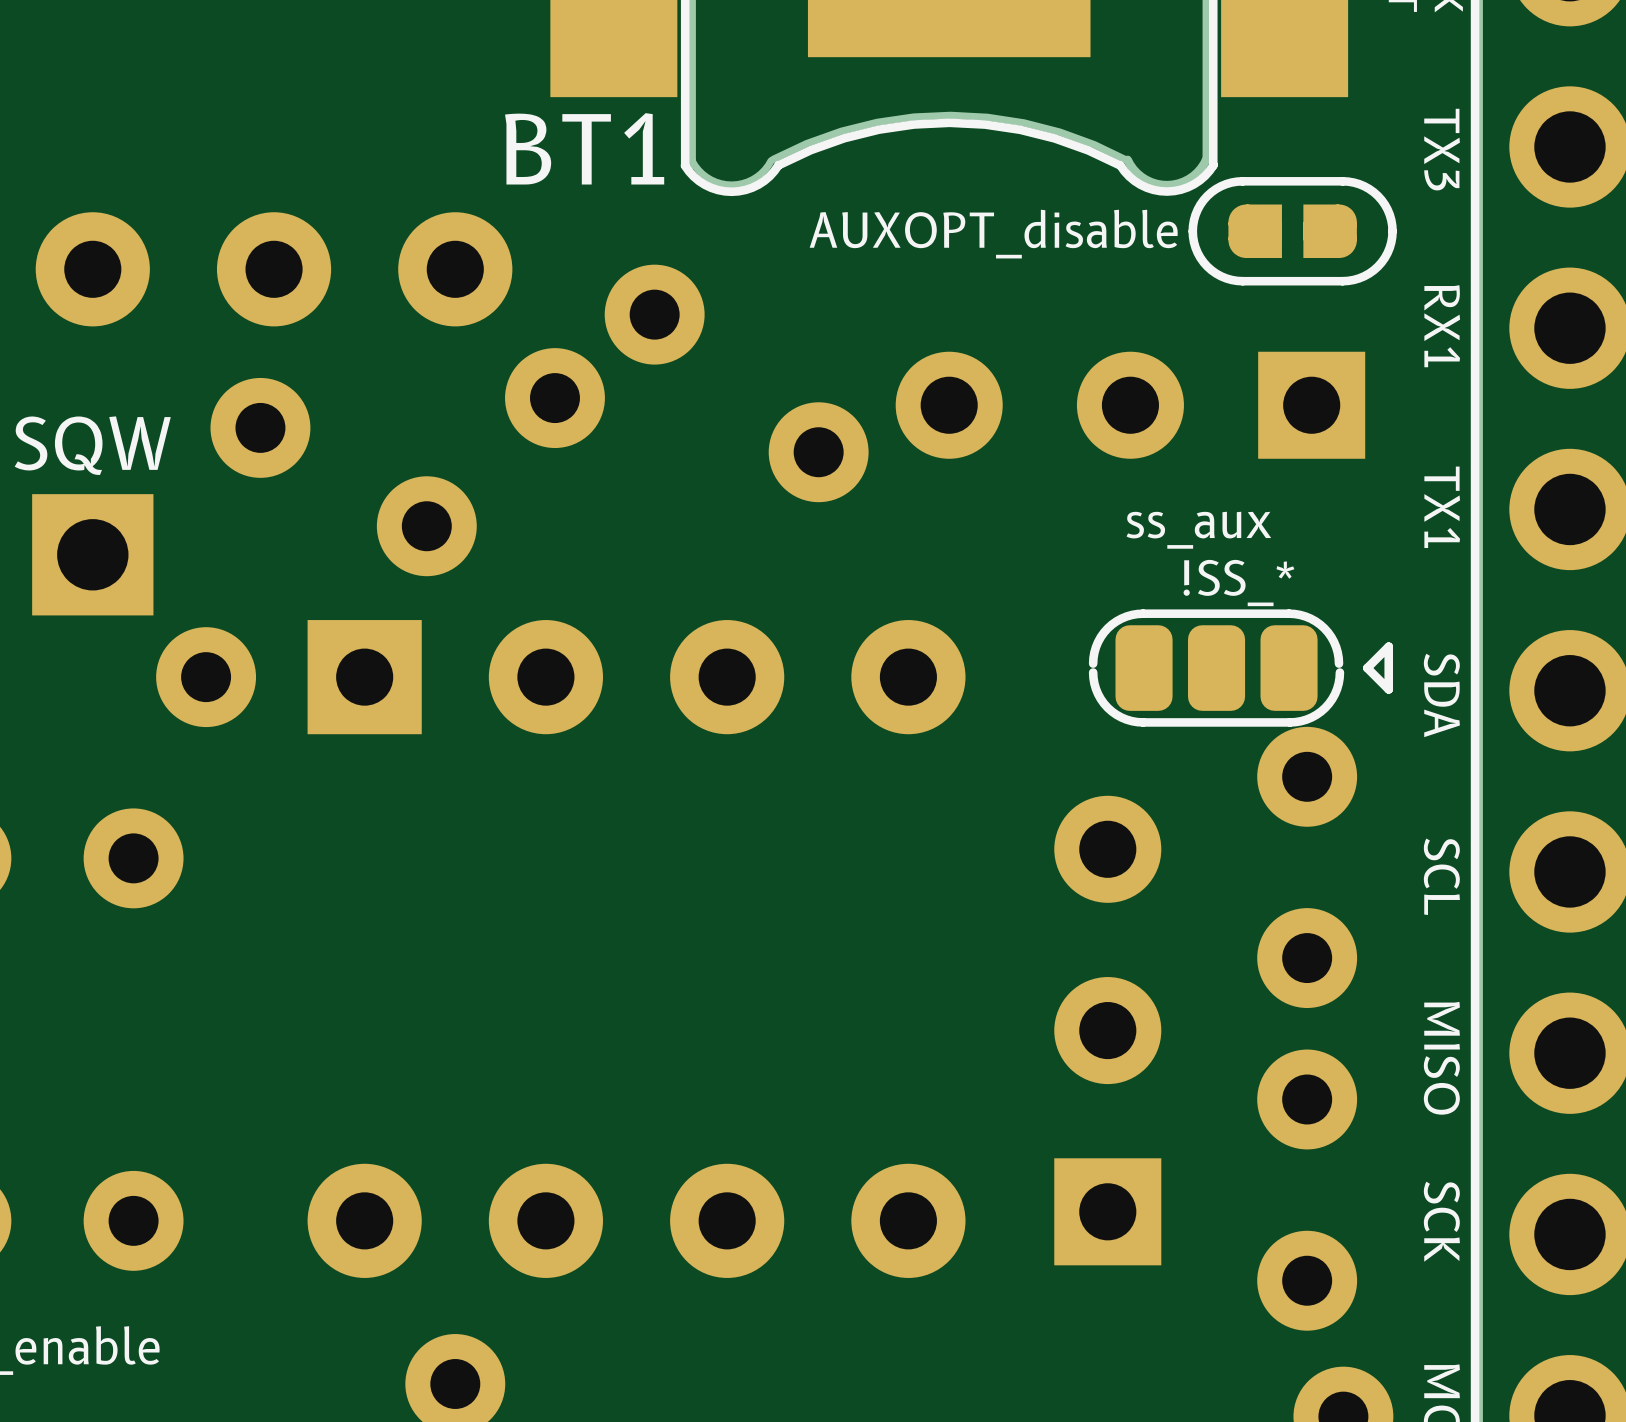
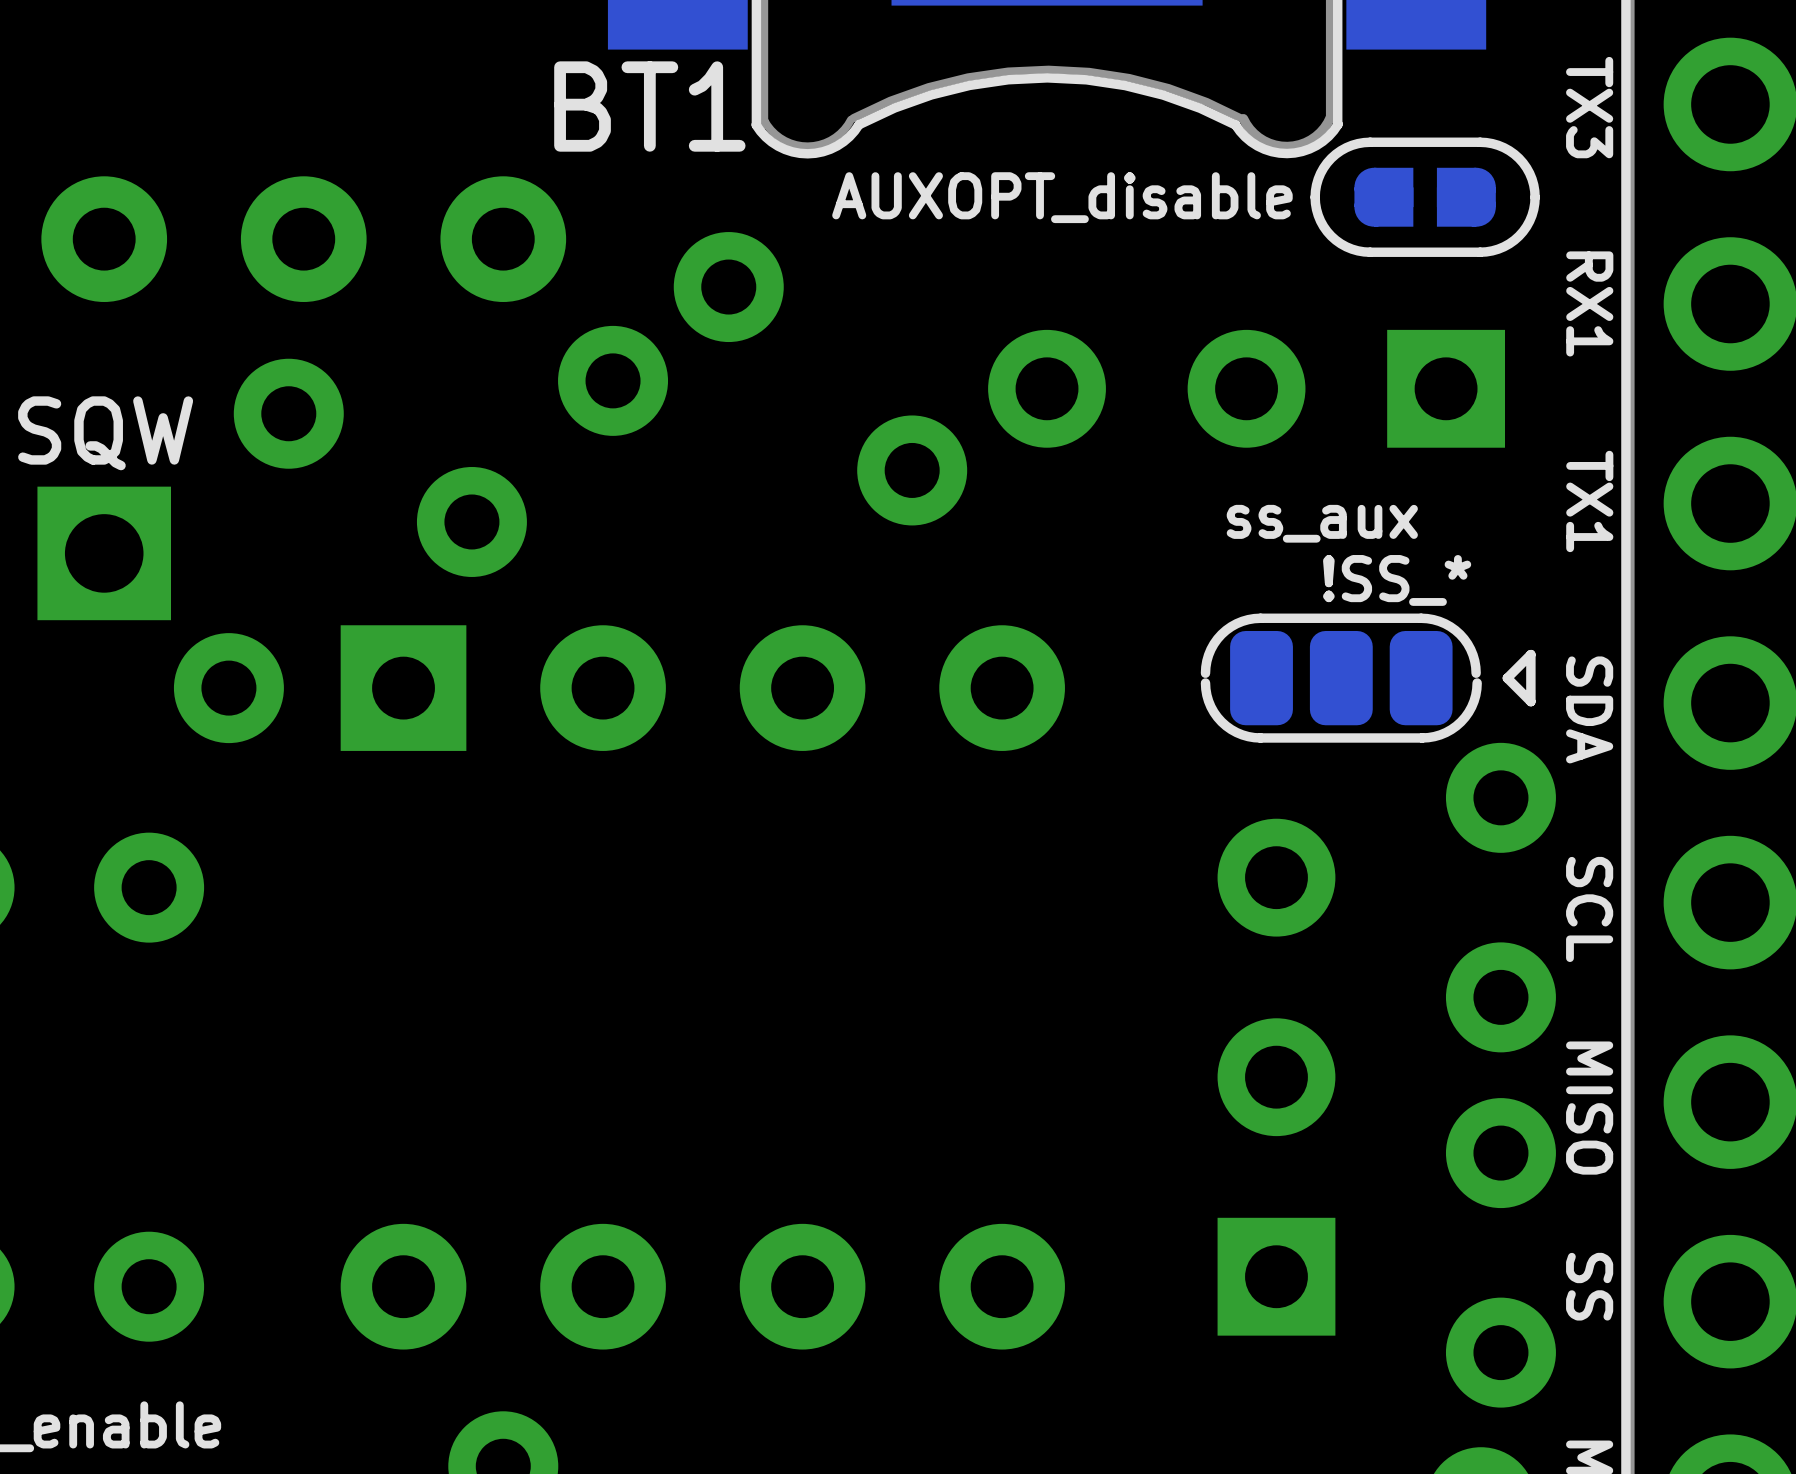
part footprint: [604, 264, 869, 503] -> [673, 232, 968, 526]
part position: (1307, 867) -> (1500, 897)
part position: (1107, 1030) -> (1276, 1077)
part position: (1307, 1190) -> (1500, 1252)
text: SCK (1441, 1221) -> SS (1589, 1286)

